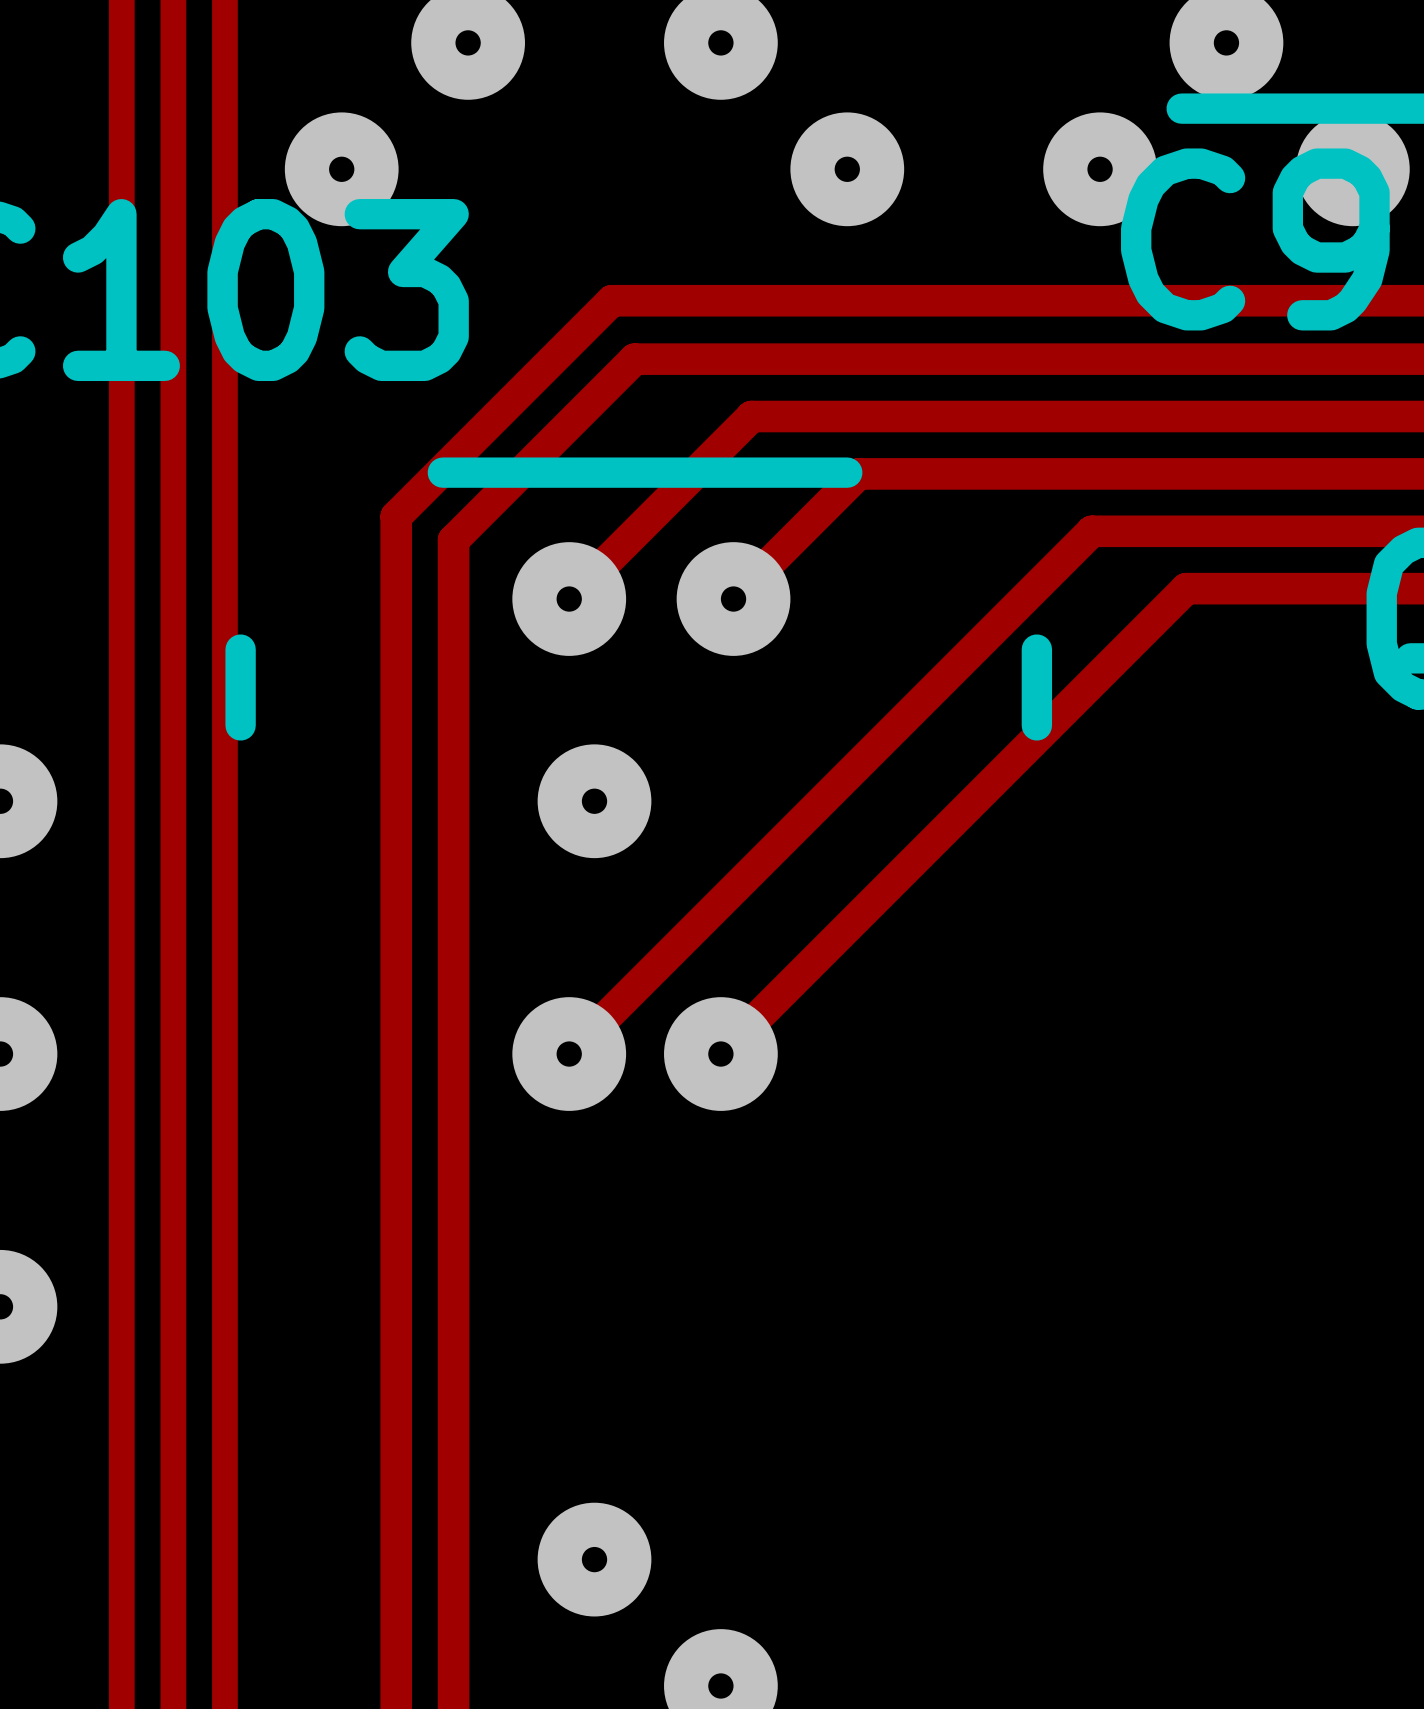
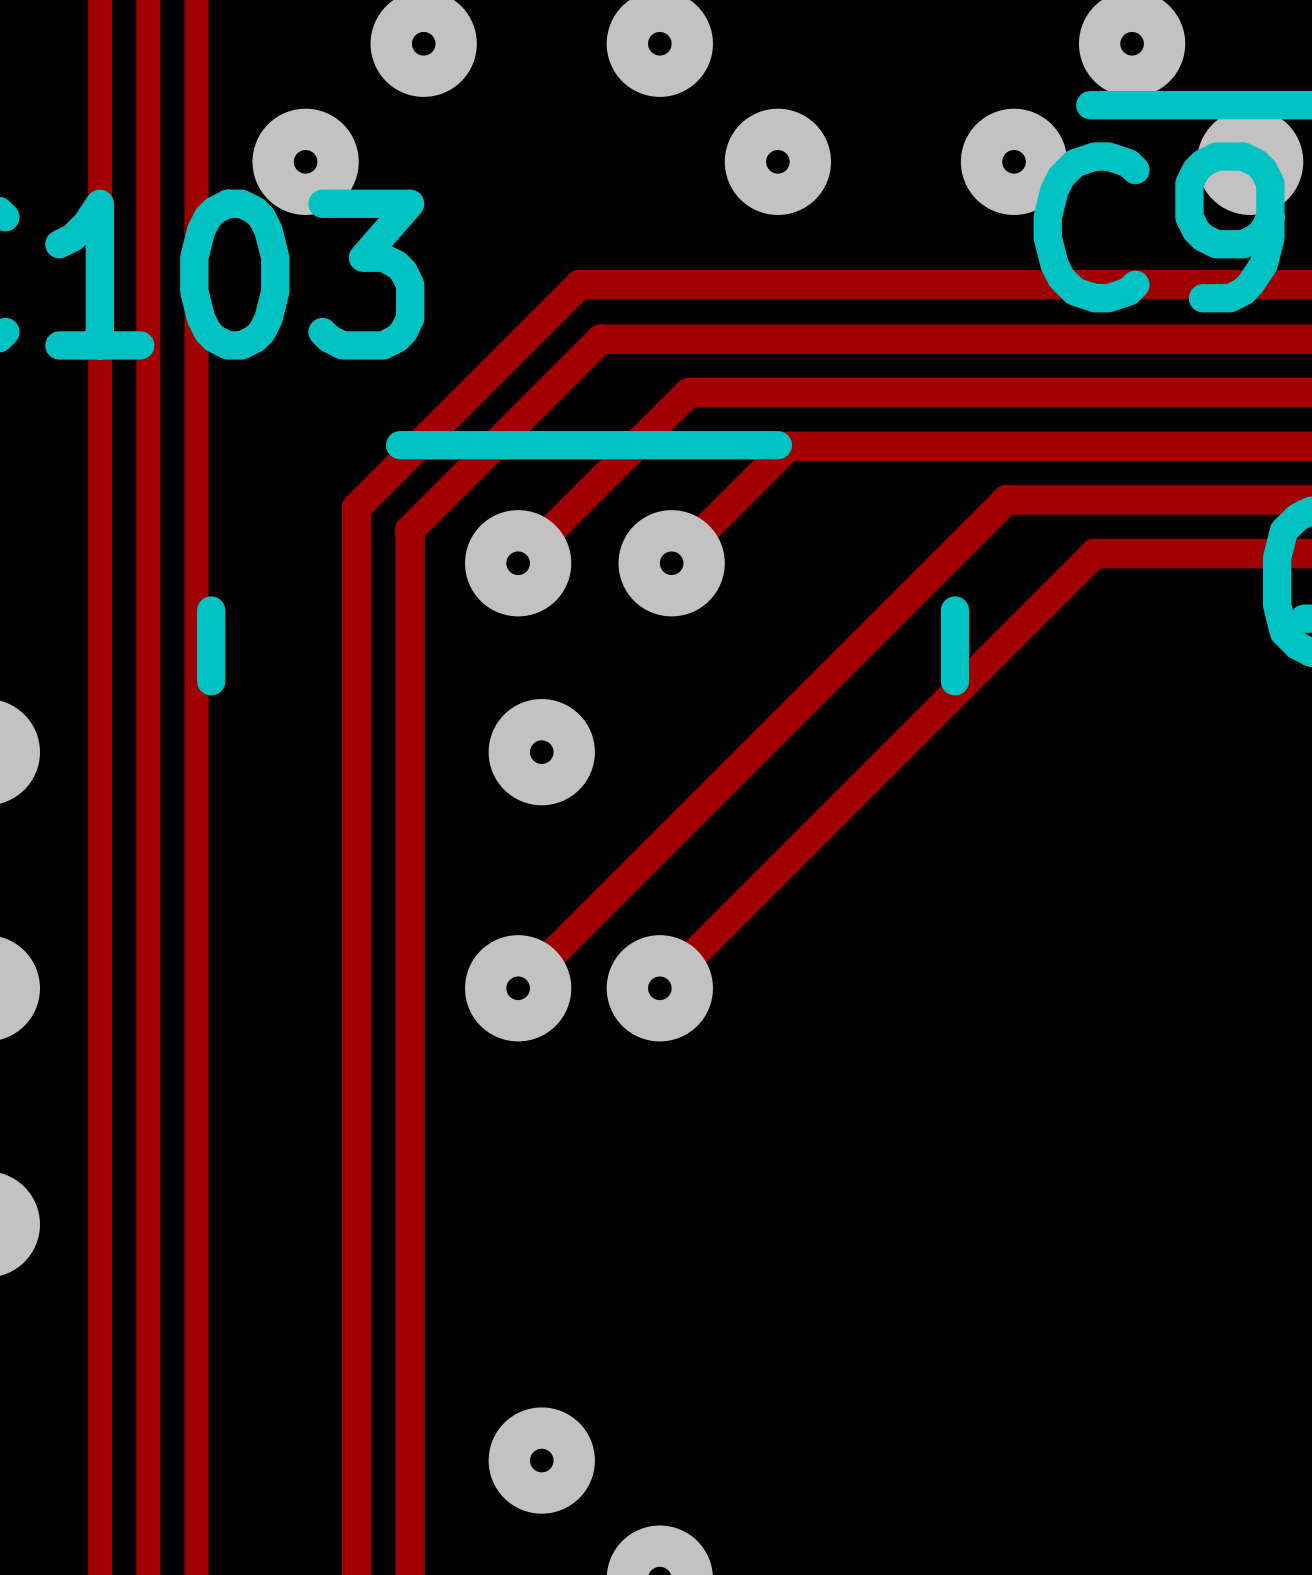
track: (634, 300) (611, 300) (396, 516) (396, 539) -> (579, 284) (356, 507)
track: (657, 359) (634, 359) (453, 540) (453, 563) -> (600, 339) (410, 529)

